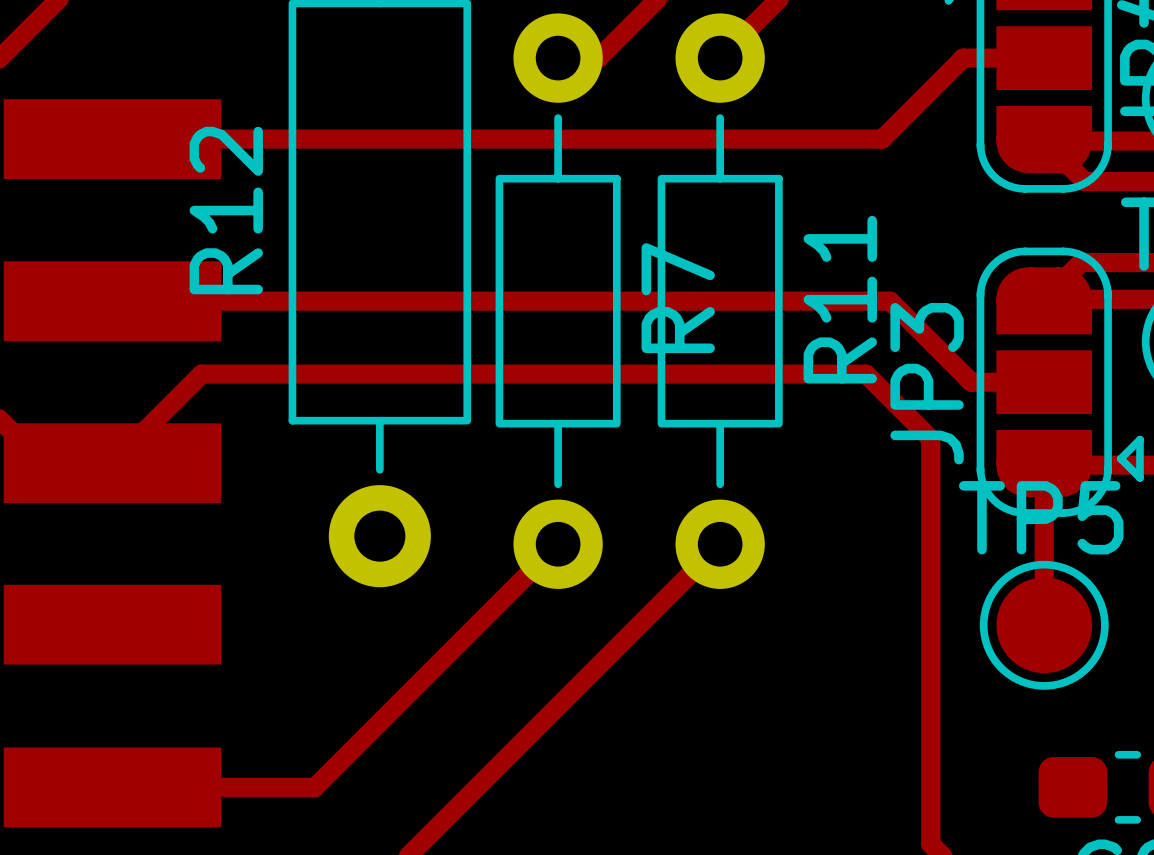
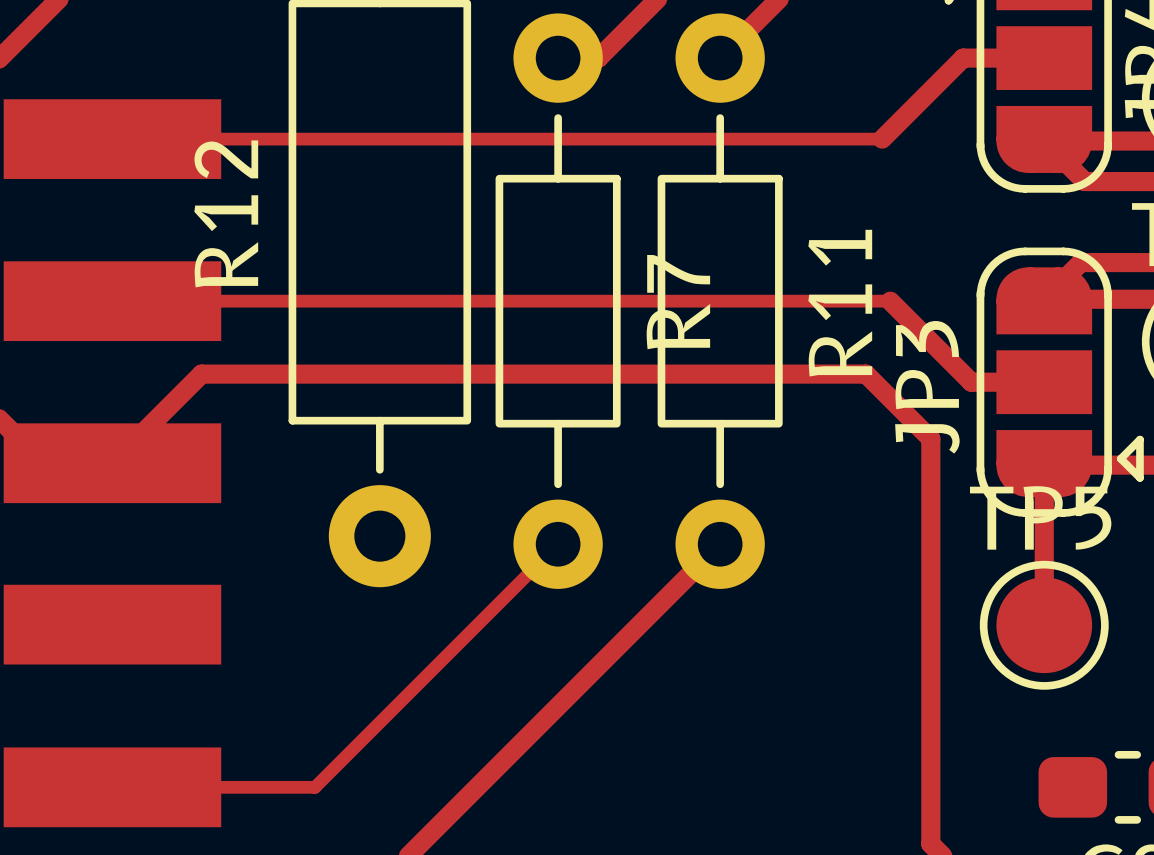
top track width: thick (112, 139) (882, 139) -> thin (112, 139) (882, 139)
top track width: thick (112, 301) (890, 301) -> thin (112, 301) (890, 301)
top track width: thick (558, 544) (315, 787) (112, 787) -> thin (558, 544) (315, 787) (112, 787)

